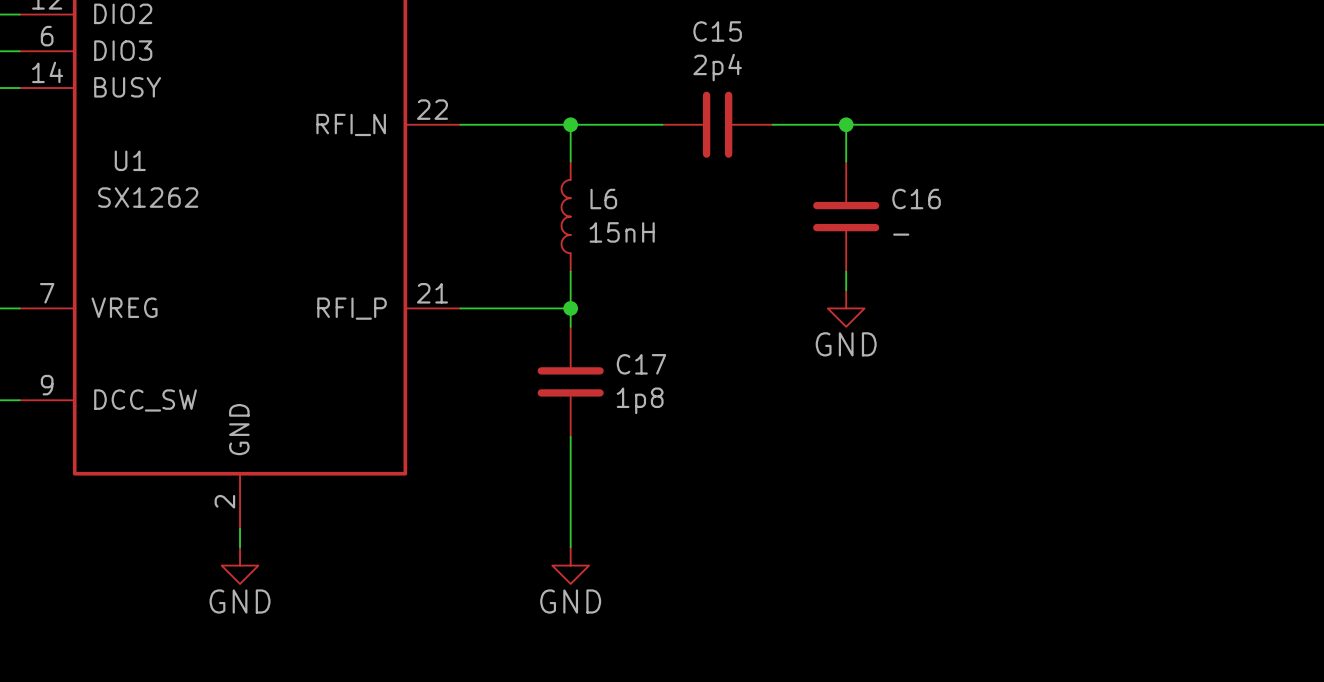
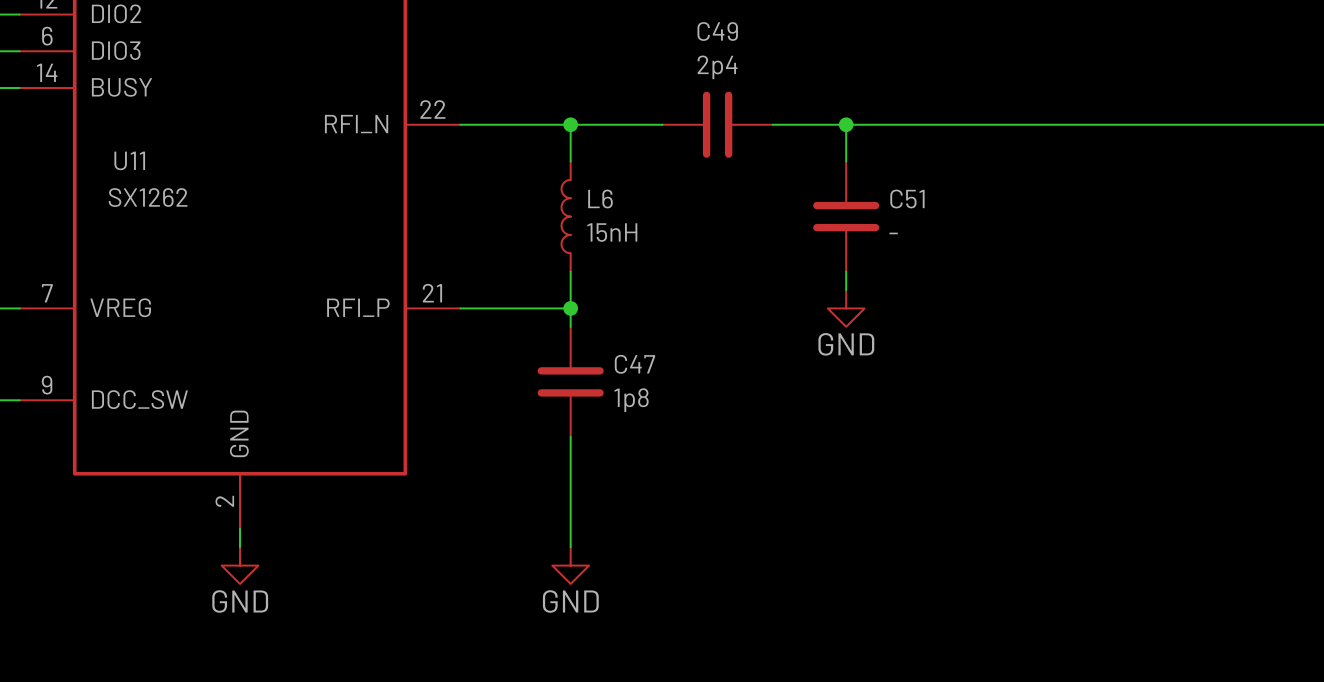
C15 name: C15 (717, 31) -> C49 (717, 31)
U1 name: U1 (130, 160) -> U11 (129, 160)
C16 name: C16 (916, 199) -> C51 (907, 199)
C17 name: C17 (641, 364) -> C47 (634, 364)

